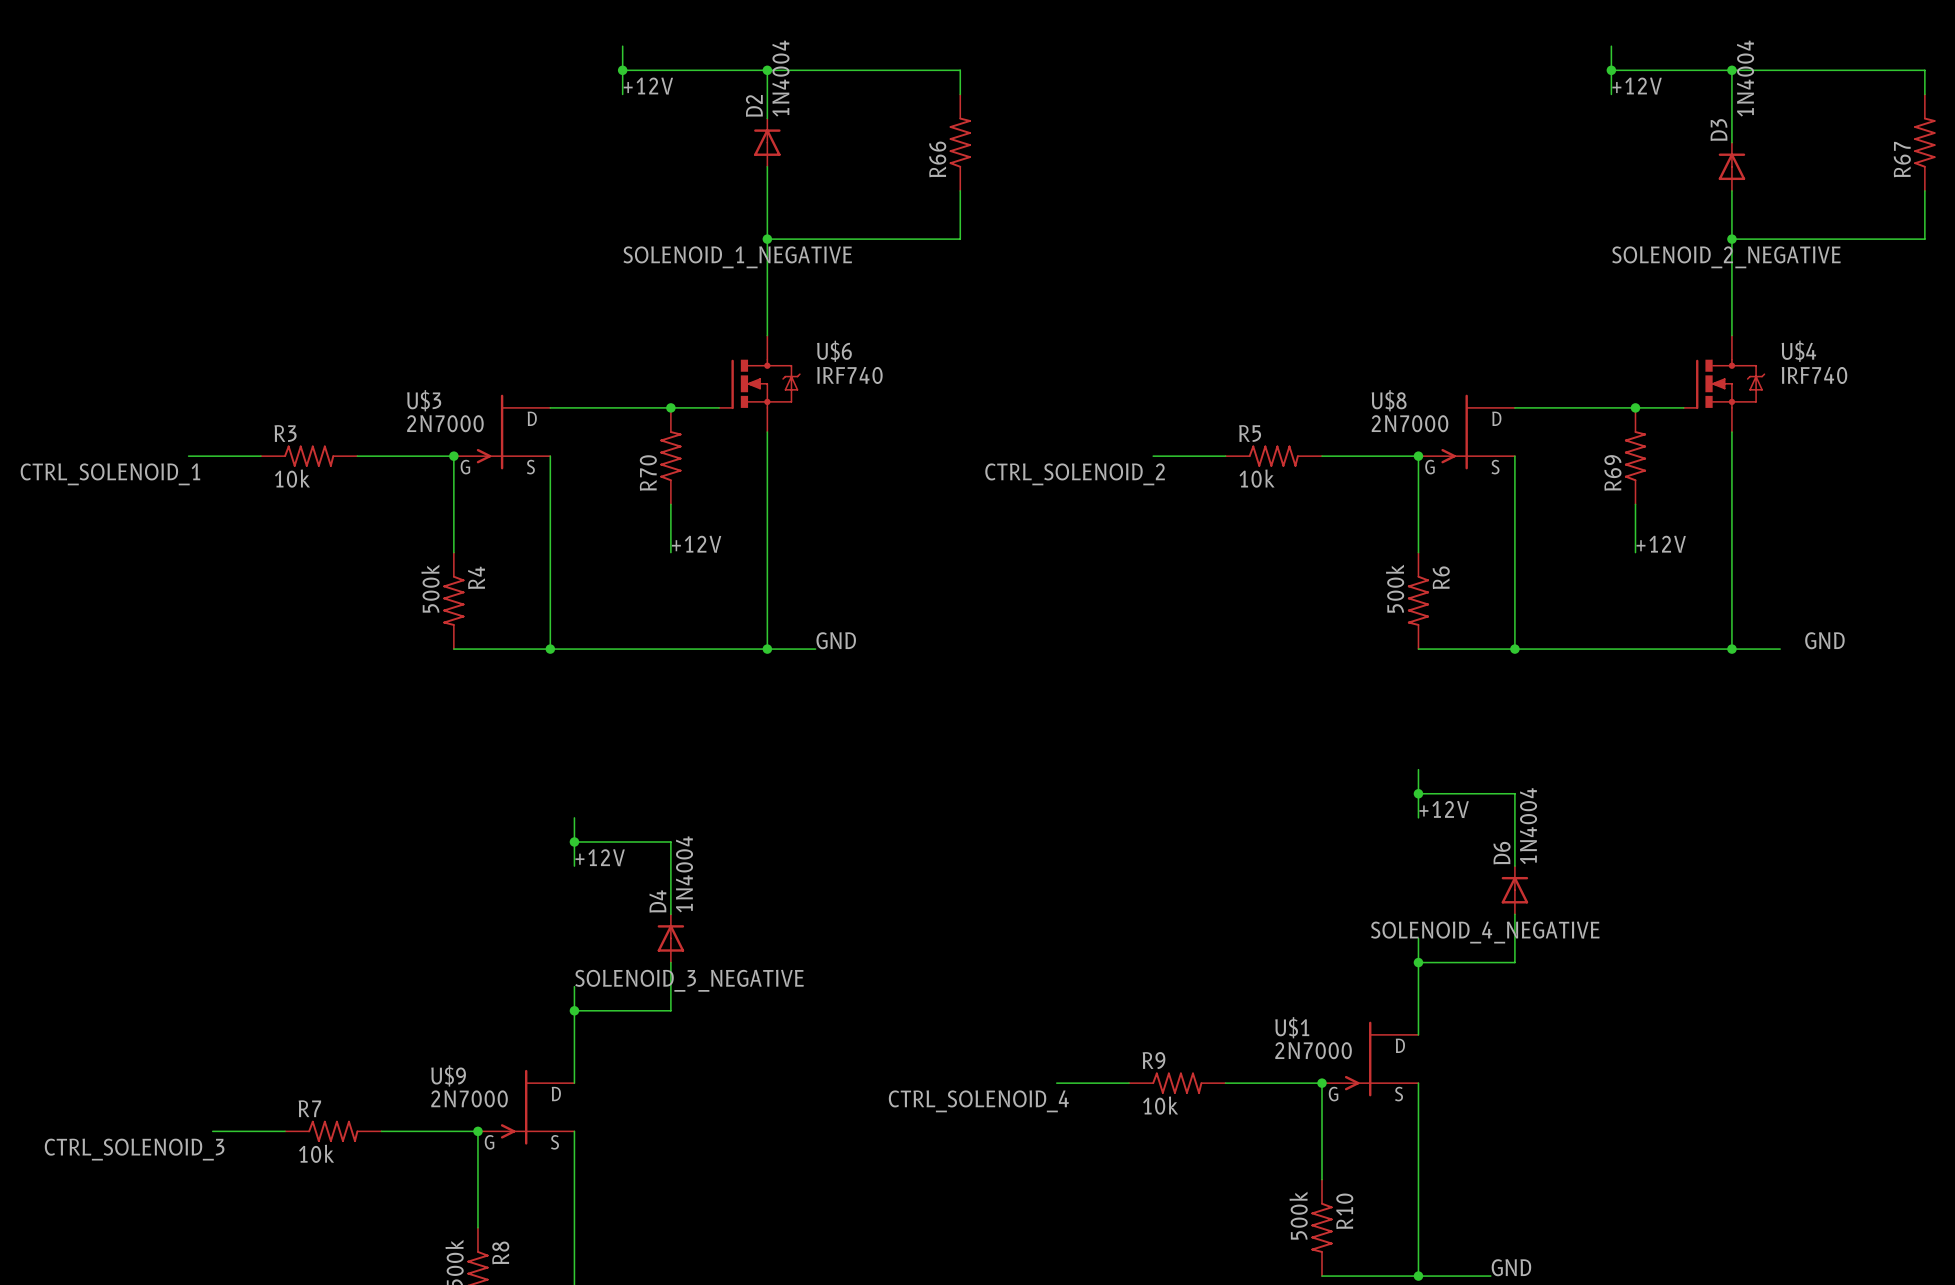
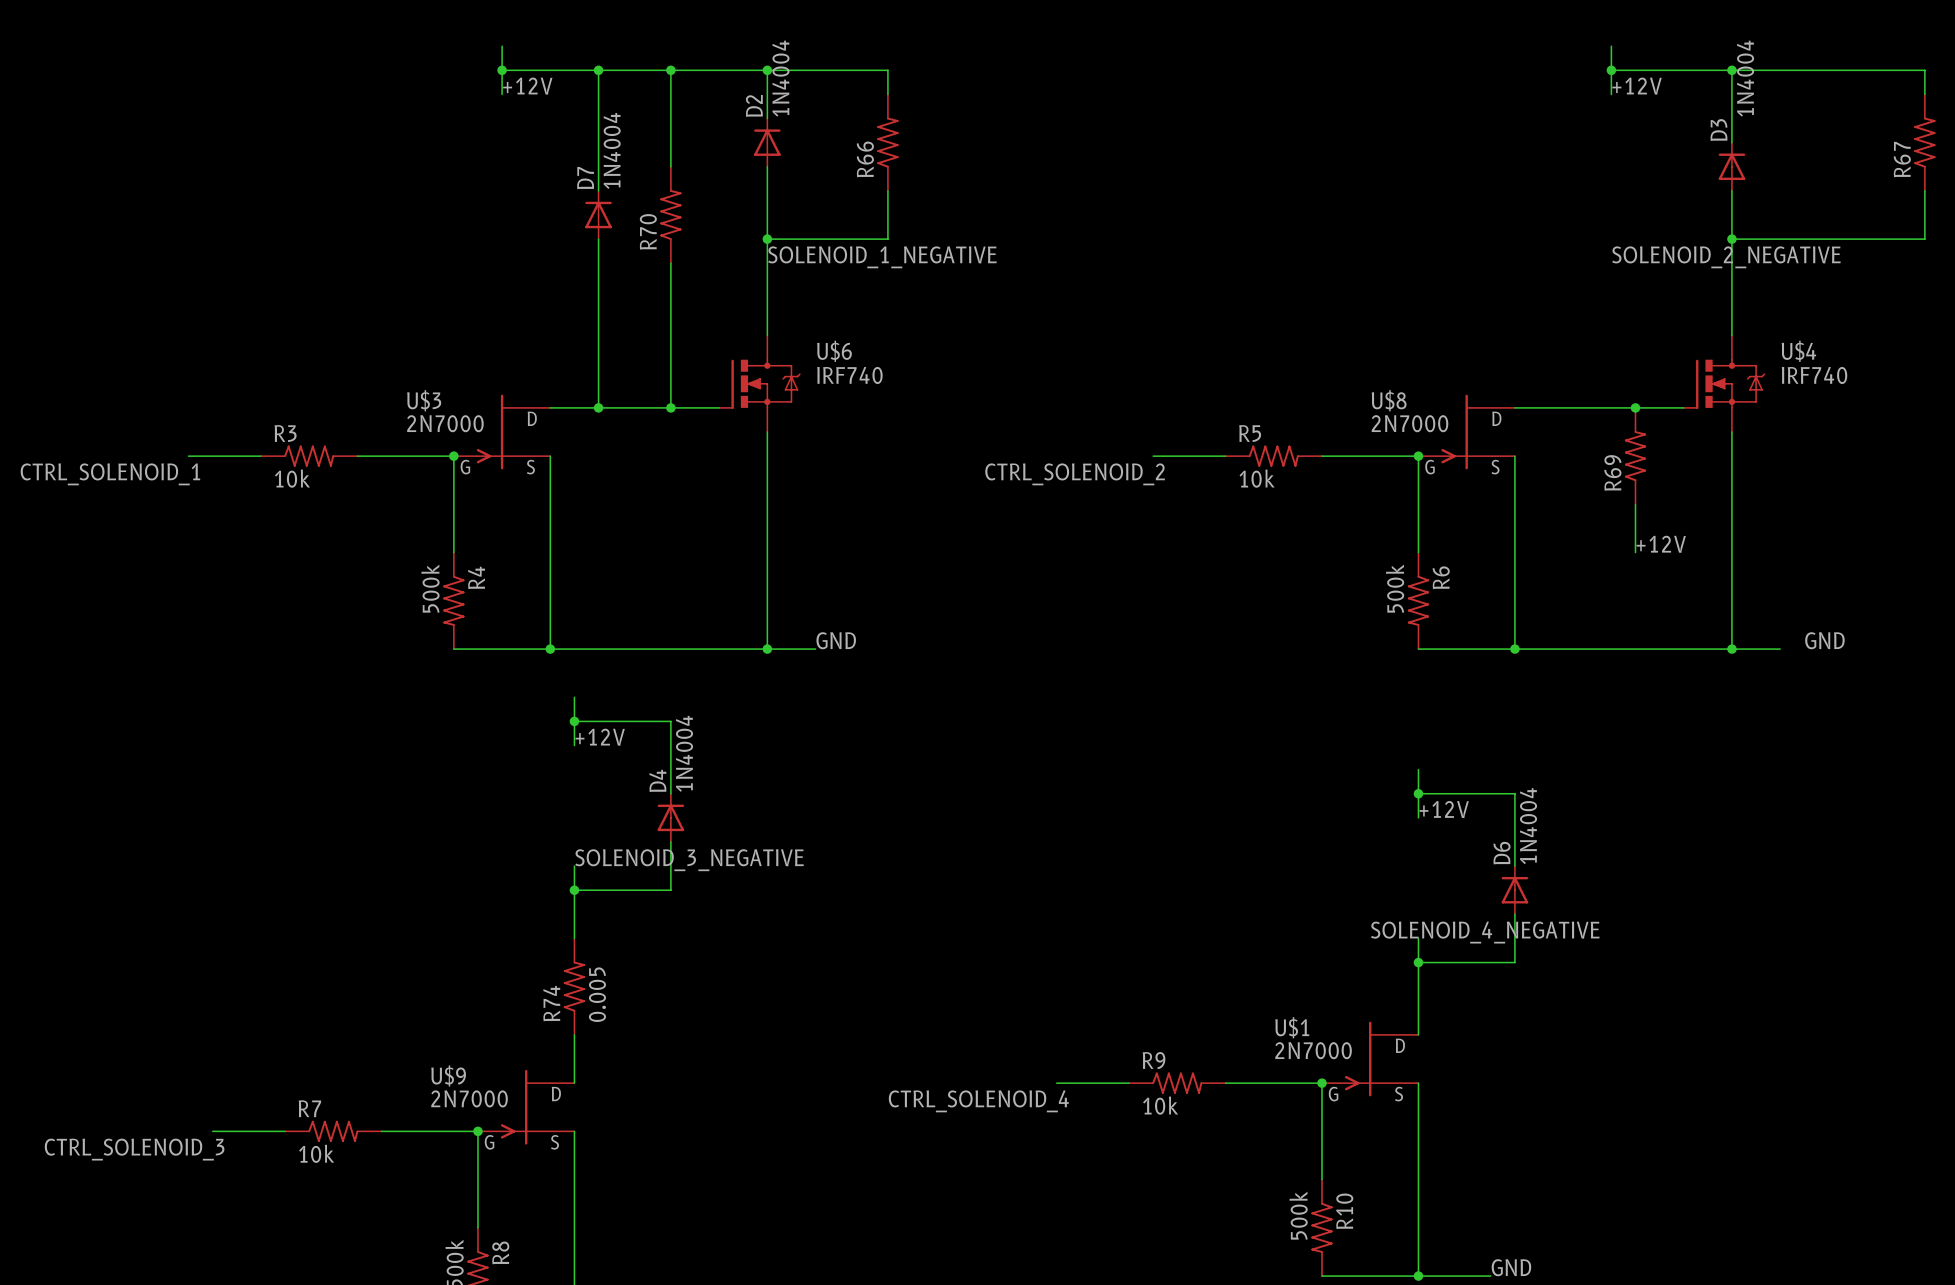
wire: (622, 46) (622, 94) -> (502, 46) (502, 94)
wire: none -> (502, 70) (622, 70)
junction: none -> (502, 70)
wire: none -> (598, 70) (598, 190)
junction: none -> (598, 70)
junction: (622, 70) -> none
wire: none -> (670, 70) (670, 166)
junction: none -> (670, 70)
wire: (887, 70) (960, 70) (960, 94) -> (887, 70) (887, 94)
label position: +12V (648, 86) -> +12V (527, 86)
R66 position: (960, 142) -> (887, 142)
wire: (960, 190) (960, 239) (887, 239) -> (887, 190) (887, 239)
D7: none -> 1N4004 (598, 215)
wire: none -> (598, 239) (598, 407)
label position: SOLENOID_1_NEGATIVE (737, 257) -> SOLENOID_1_NEGATIVE (882, 257)
wire: none -> (670, 263) (670, 407)
junction: none -> (598, 407)
R70 position: (670, 456) -> (670, 215)
wire: (670, 504) (670, 552) -> (574, 697) (574, 745)
label position: +12V (696, 544) -> +12V (600, 737)
wire: none -> (574, 721) (670, 721) (670, 793)
junction: none -> (574, 721)
wire: (574, 817) (574, 866) -> (574, 938) (574, 866)
wire: (574, 841) (670, 841) -> none
junction position: (574, 841) -> (574, 890)
label: +12V (600, 857) -> SOLENOID_3_NEGATIVE (689, 860)
wire: (670, 890) (670, 914) -> (670, 890) (574, 890)
D4 position: (670, 938) -> (670, 817)
wire: (670, 962) (670, 1010) (574, 1010) -> none
label: SOLENOID_3_NEGATIVE (689, 980) -> none
R74: none -> 0.005 (574, 986)
junction: (574, 1010) -> none

